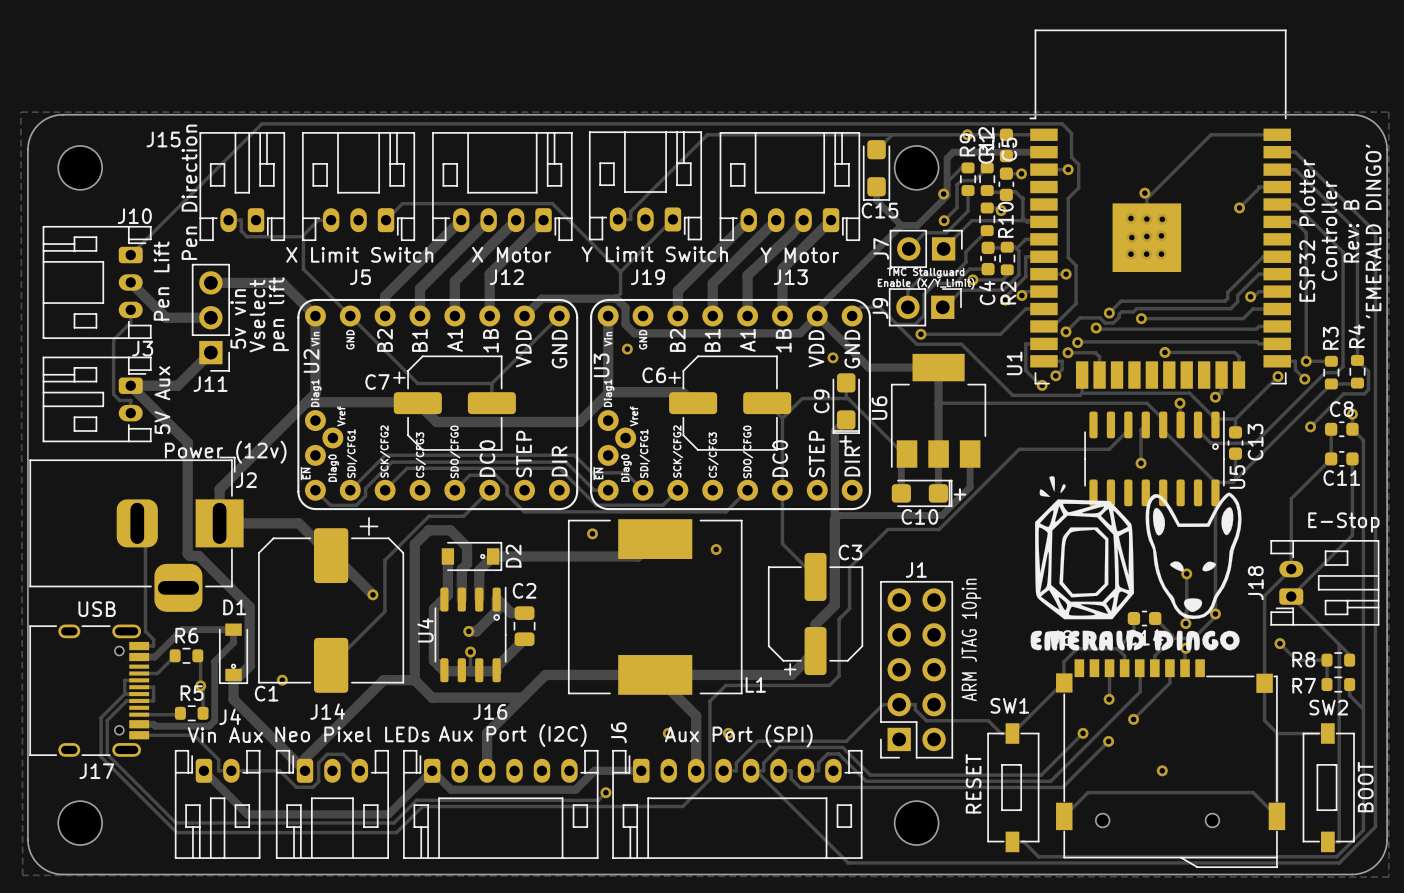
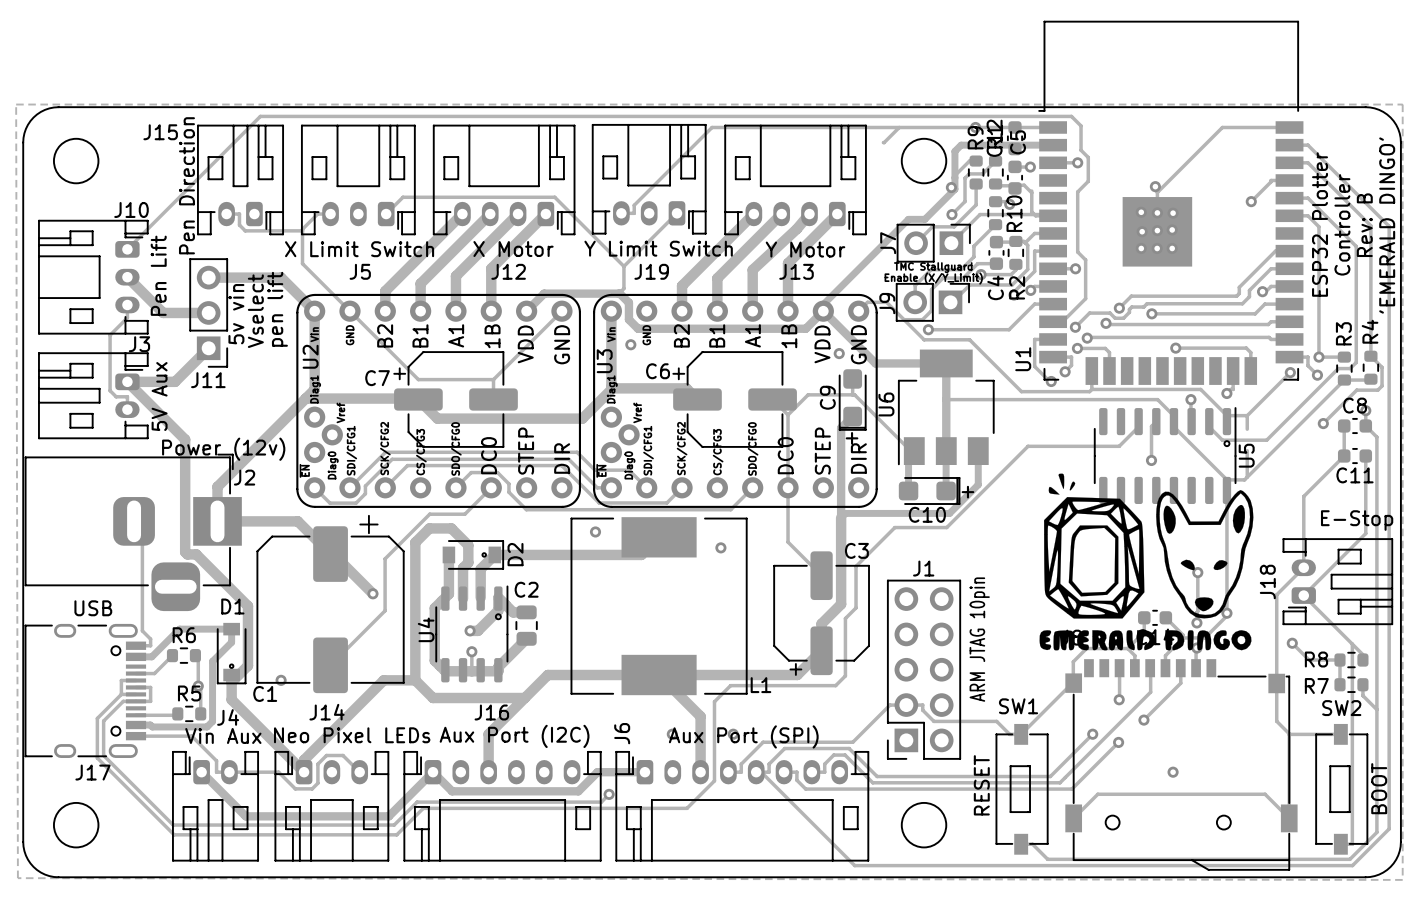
C15: (876, 170) -> none
track: (876, 186) (876, 200) (901, 225) -> none
C13: (1235, 443) -> none
U5 name position: U5 (1237, 477) -> U5 (1246, 455)

